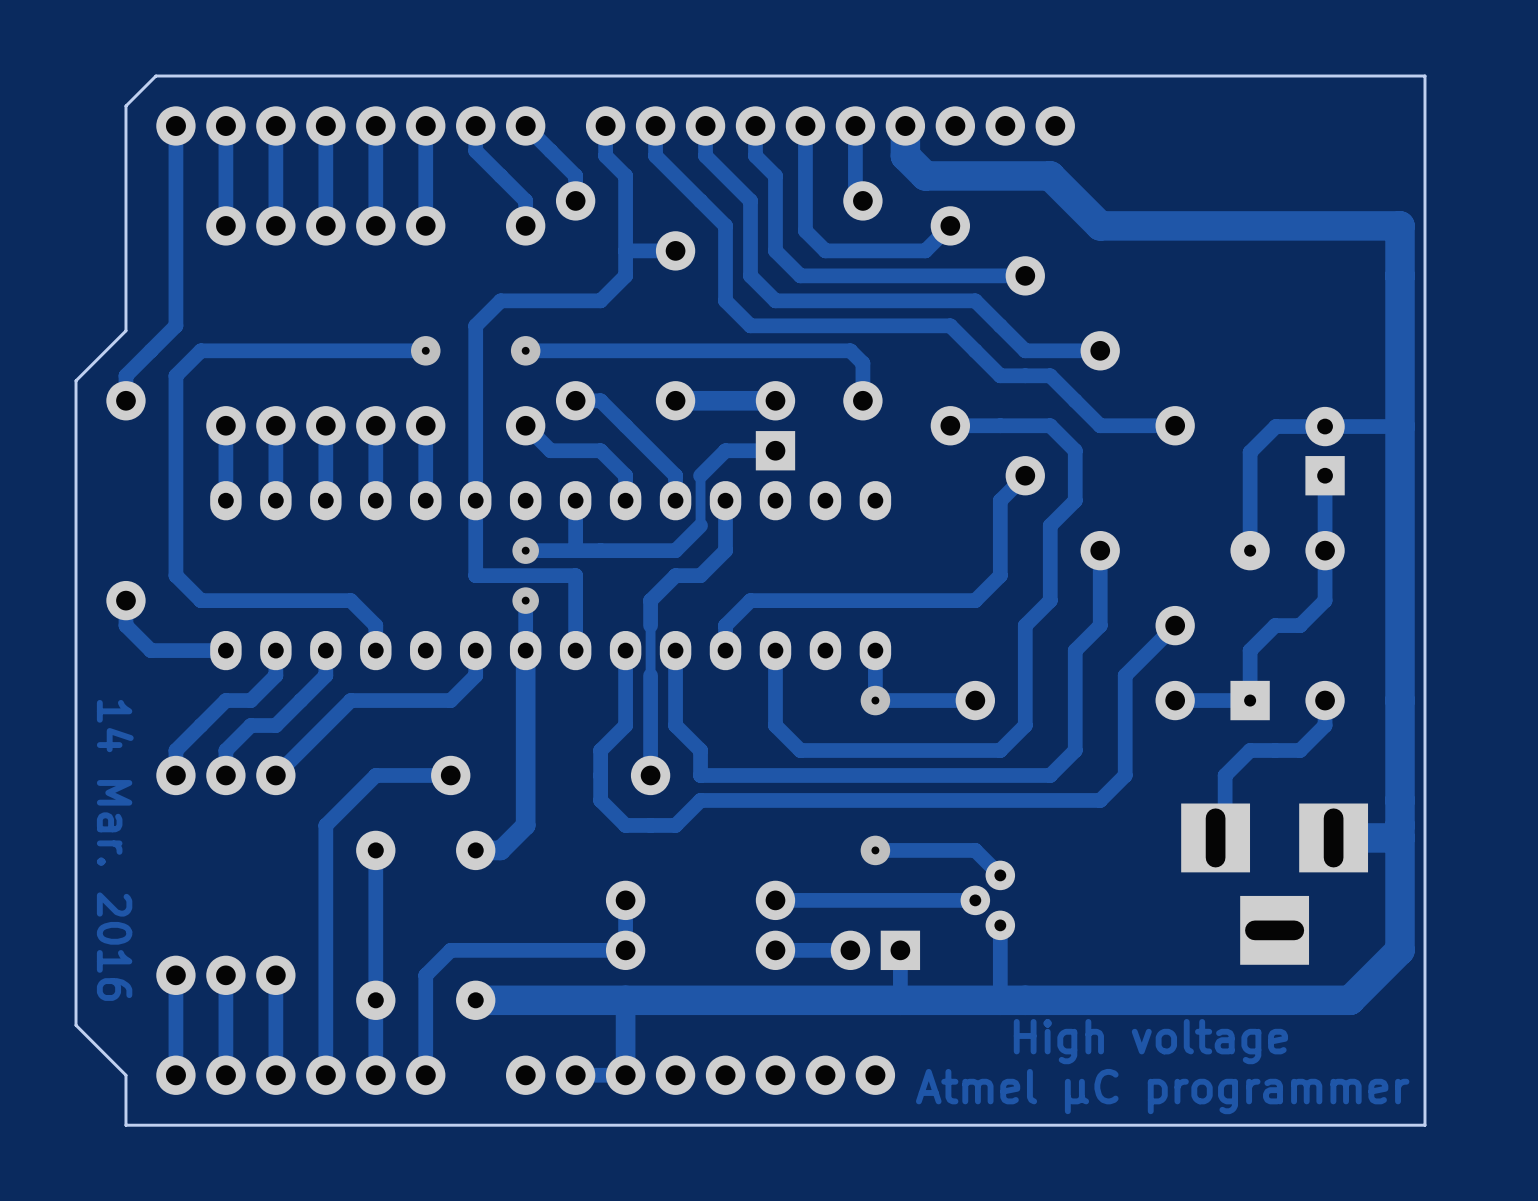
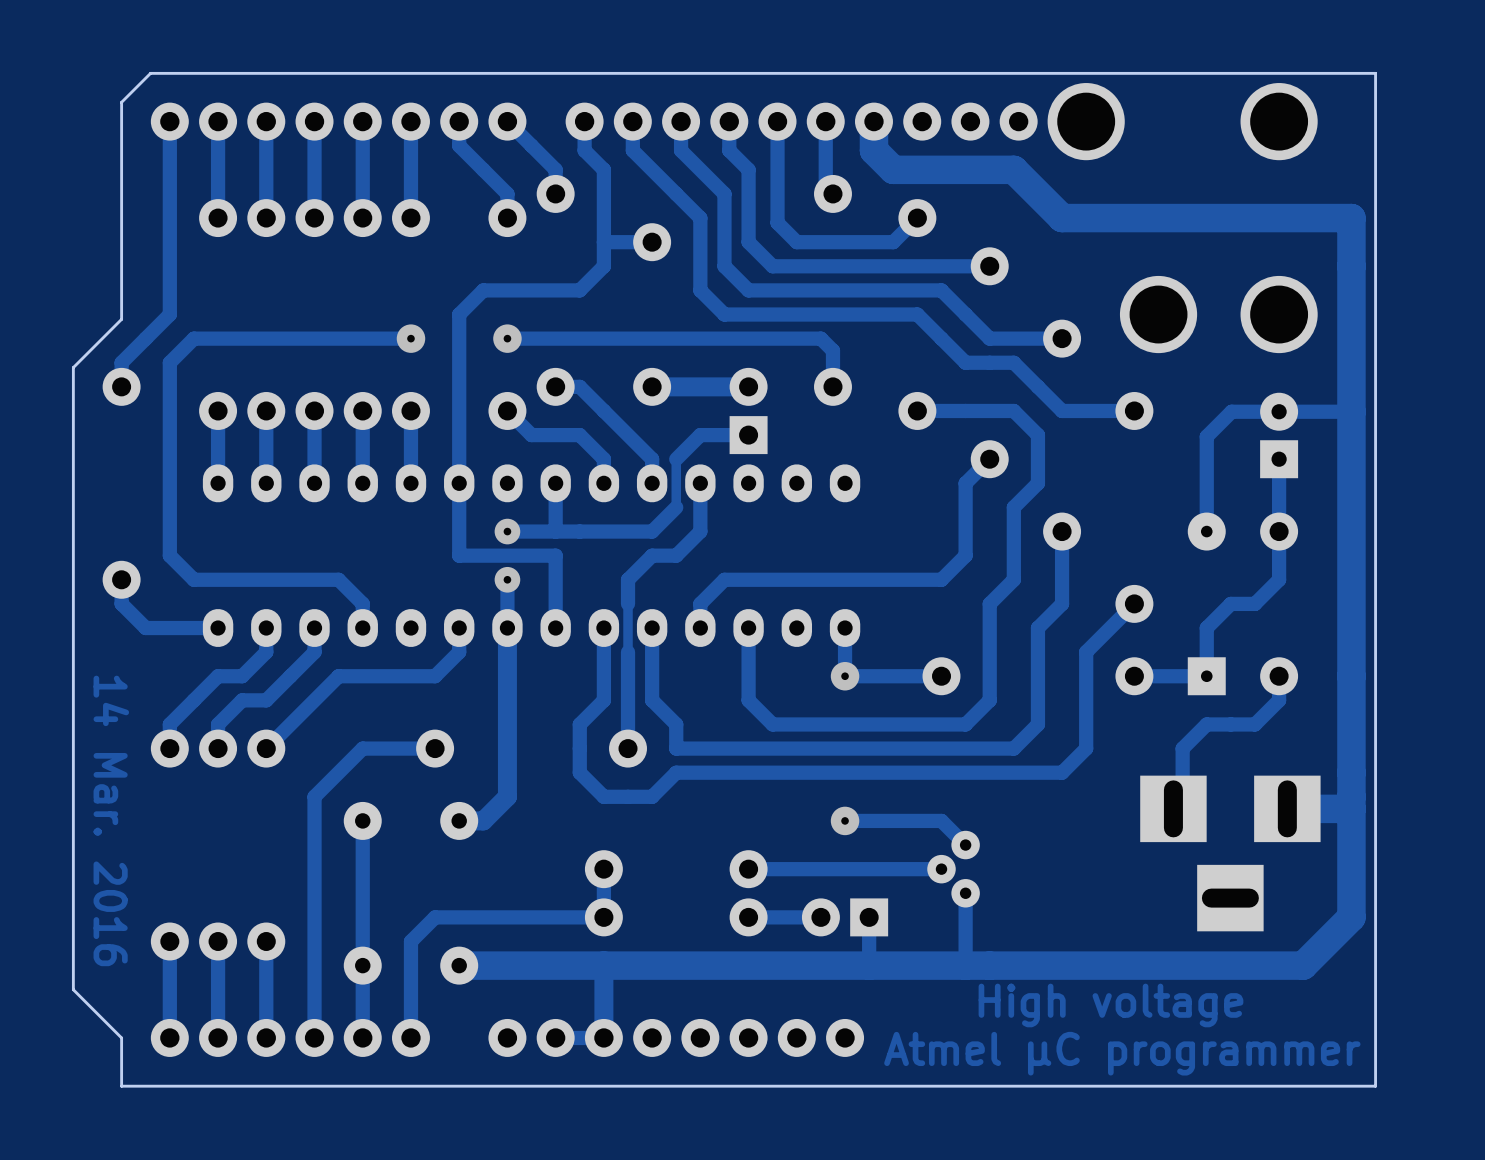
part: none -> (1086, 121)
part: none -> (1279, 121)
part: none -> (1158, 314)
part: none -> (1279, 314)

